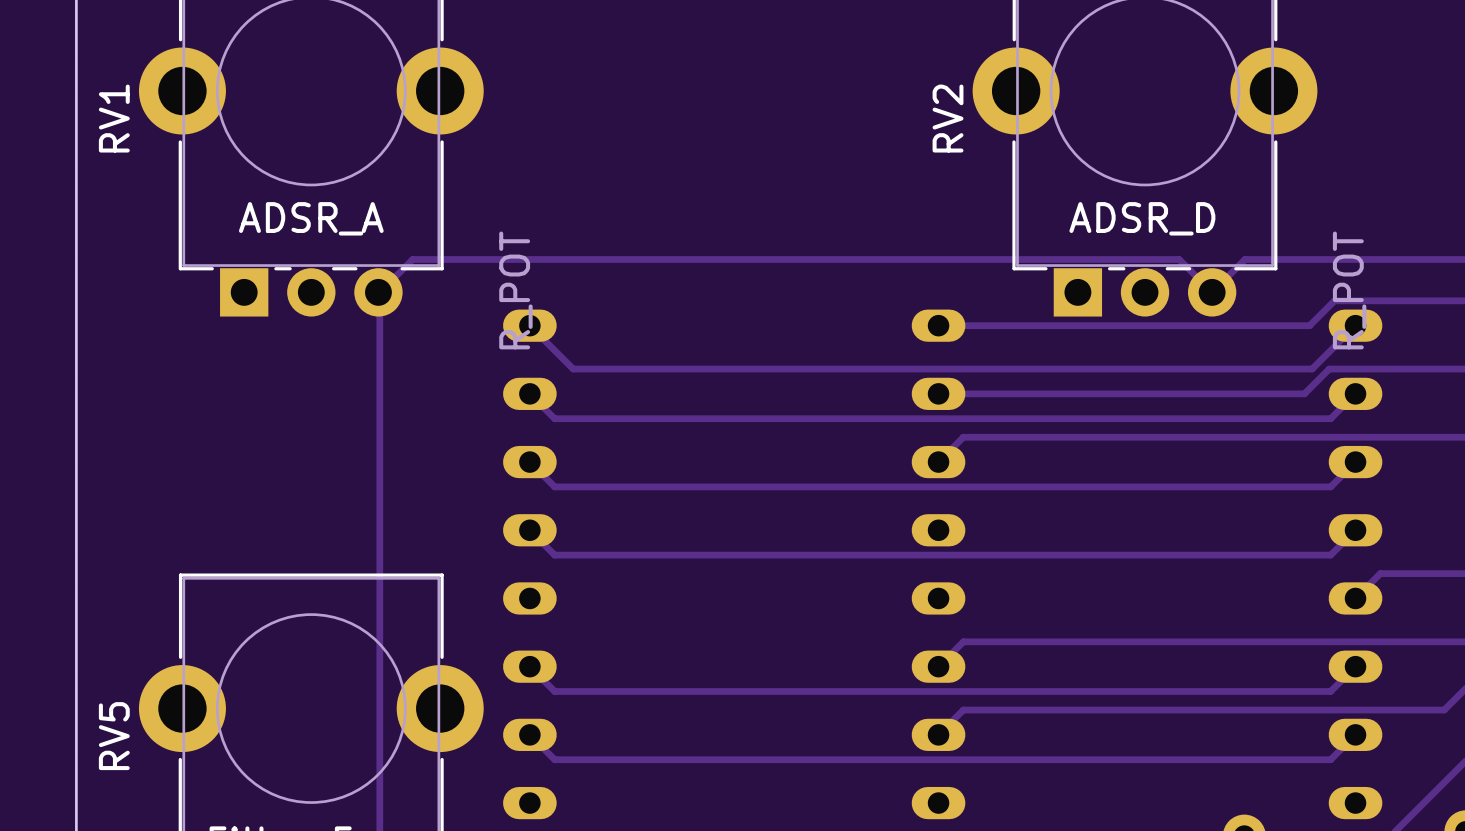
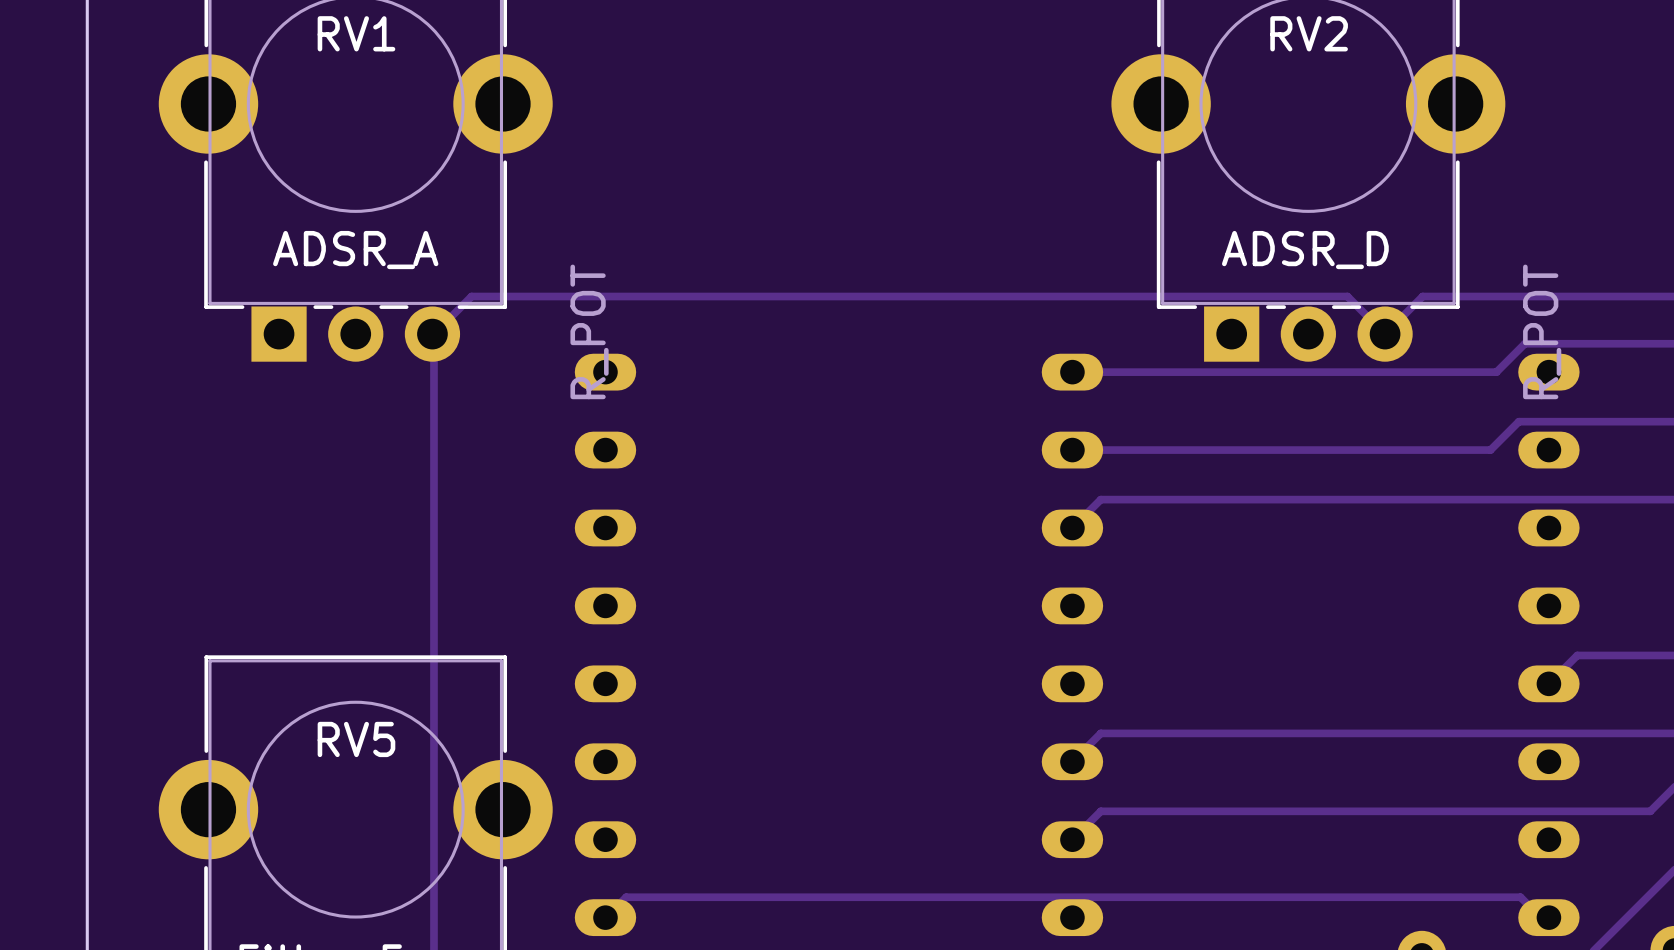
RV1 name rotation: 0° (114, 118) -> 90° clockwise (356, 33)
RV1 name position: RV1 (114, 118) -> RV1 (356, 33)
RV2 name rotation: 0° (948, 118) -> 90° clockwise (1309, 33)
RV2 name position: RV2 (948, 118) -> RV2 (1309, 33)
track: (529, 325) (573, 369) (1312, 369) (1355, 325) -> none
track: (529, 393) (554, 418) (1330, 418) (1355, 393) -> none
track: (529, 462) (554, 486) (1330, 486) (1355, 462) -> none
track: (529, 530) (554, 555) (1330, 555) (1355, 530) -> none
track: (529, 666) (554, 691) (1330, 691) (1355, 666) -> none
track: (529, 734) (554, 759) (1330, 759) (1355, 734) -> none
RV5 name rotation: 0° (114, 736) -> 90° clockwise (356, 739)
RV5 name position: RV5 (114, 736) -> RV5 (356, 739)
track: none -> (597, 925) (626, 897) (1520, 897) (1548, 925)

